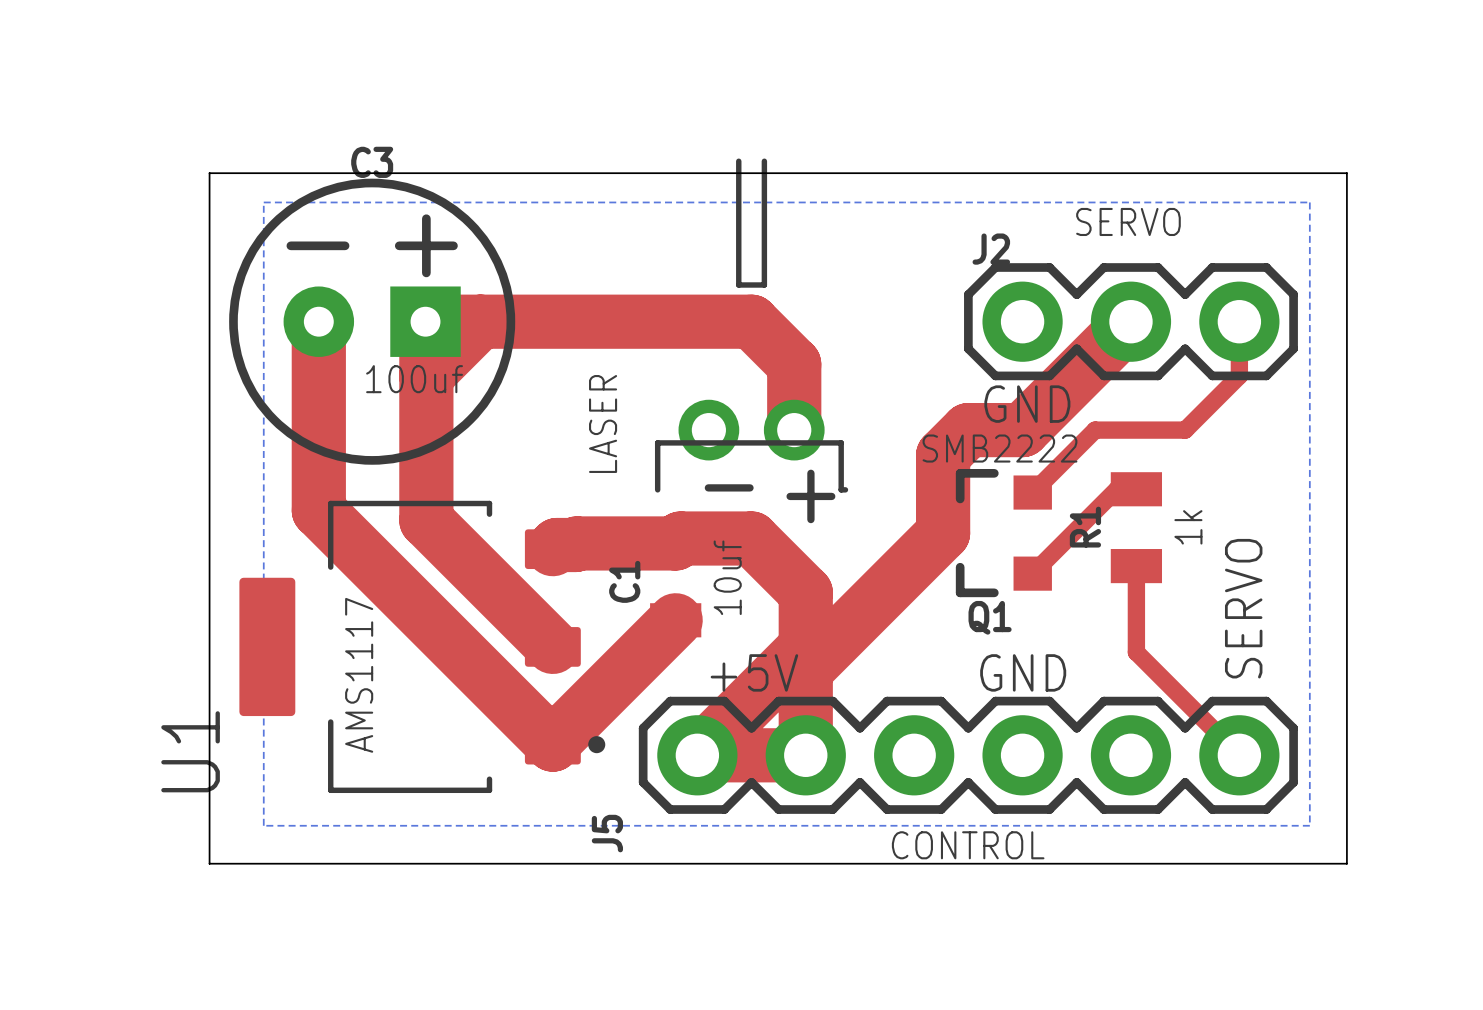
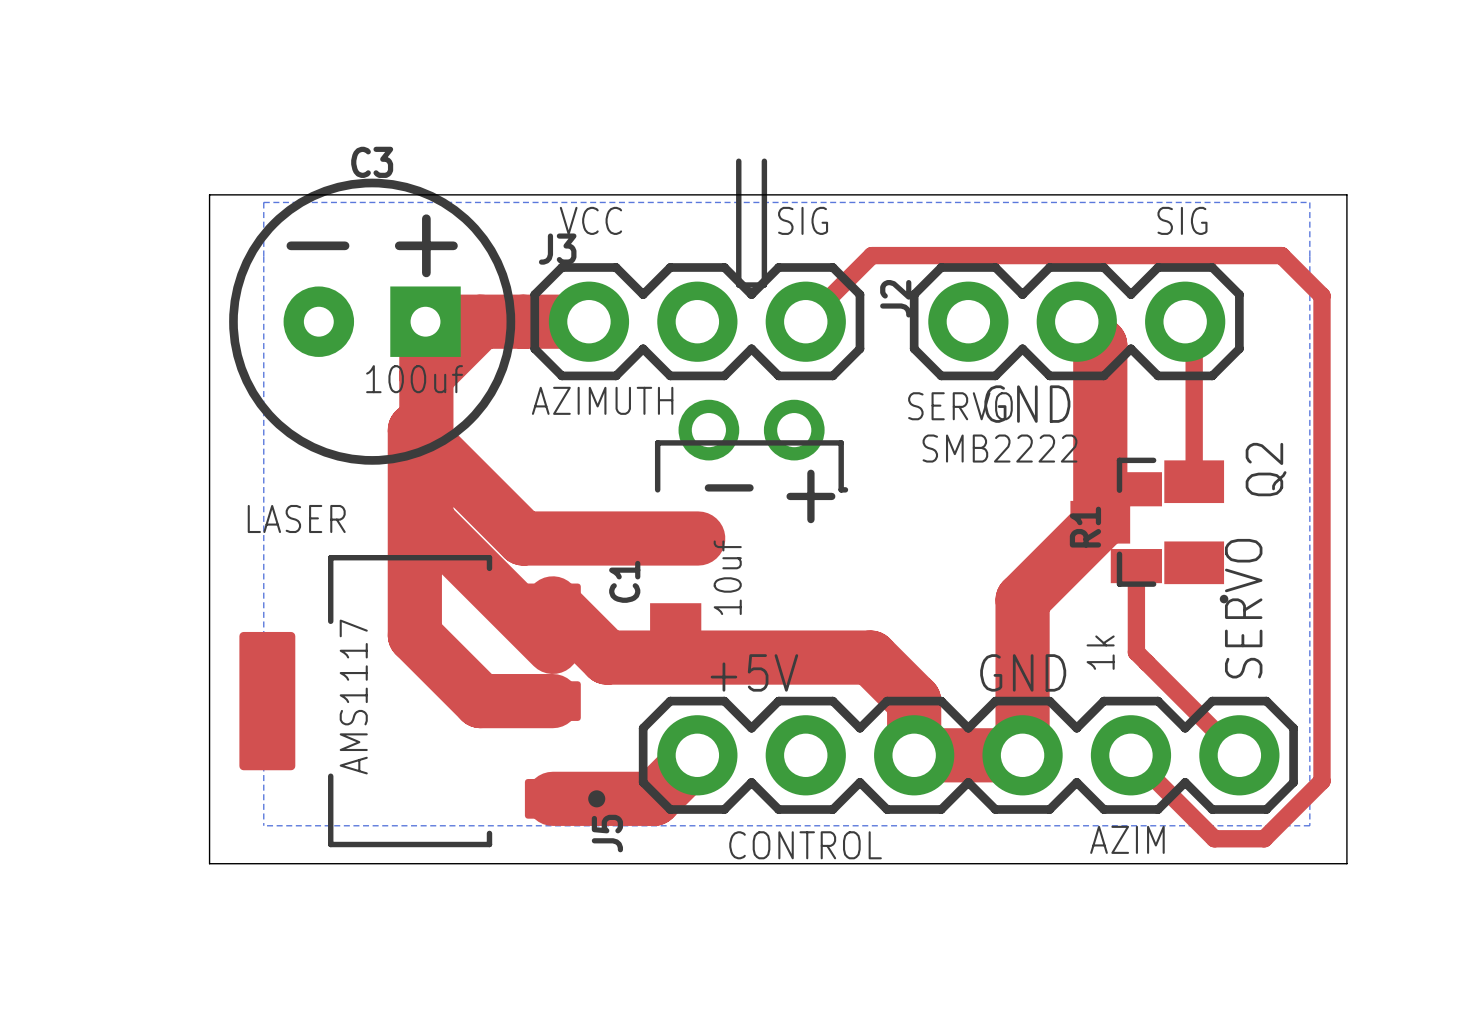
board edge: (209, 194) (209, 173) (1346, 173) (1346, 194) -> (209, 194) (1346, 194)
text: none -> VCC (590, 220)
text: none -> SIG (803, 220)
text: none -> SIG (1182, 220)
text position: SERVO (1128, 221) -> SERVO (960, 406)
J2 name rotation: 0° (991, 249) -> 90° counterclockwise (895, 298)
J2 name position: J2 (991, 249) -> J2 (895, 298)
top track: (318, 321) (318, 510) (552, 744) (675, 620) -> none
top track: (588, 321) (751, 321) (794, 364) (794, 430) -> none
J3: none -> (697, 321)
top track: none -> (805, 321) (871, 255) (1281, 255) (1321, 295) (1321, 781) (1264, 838) (1214, 838) (1130, 755)
top track: none -> (1076, 321) (1100, 345) (1100, 522) (1022, 599) (1022, 755) (914, 755) (914, 701) (870, 657) (607, 657) (552, 603)
top track: (1130, 321) (1022, 430) (968, 430) (943, 455) (943, 533) (805, 670) -> none
J2 position: (1130, 321) -> (1076, 321)
top track: none -> (1185, 321) (1194, 330) (1194, 481)
top track: (1239, 321) (1239, 375) (1185, 430) (1095, 430) (1032, 492) -> none
text: none -> AZIMUTH (602, 400)
text rotation: 0° (603, 423) -> 90° clockwise (296, 518)
text position: LASER (603, 423) -> LASER (296, 518)
top track: (1136, 489) (1117, 489) (1032, 573) -> none
text position: 1k (1188, 527) -> 1k (1100, 652)
Q2: none -> (1149, 530)
Q1: (987, 533) -> none
top track: (680, 538) (675, 543) (576, 543) (557, 545) (552, 549) -> (680, 538) (523, 538) (414, 430) (414, 635) (480, 701) (552, 701)
top track: (698, 538) (751, 538) (805, 592) (805, 755) (697, 755) (805, 646) -> none
U1: (422, 646) -> none
text position: AMS1117 (359, 675) -> AMS1117 (353, 697)
part: none -> (422, 701)
top track: none -> (697, 755) (653, 798) (552, 798)
text: none -> AZIM (1127, 839)
text position: CONTROL (968, 845) -> CONTROL (805, 845)

